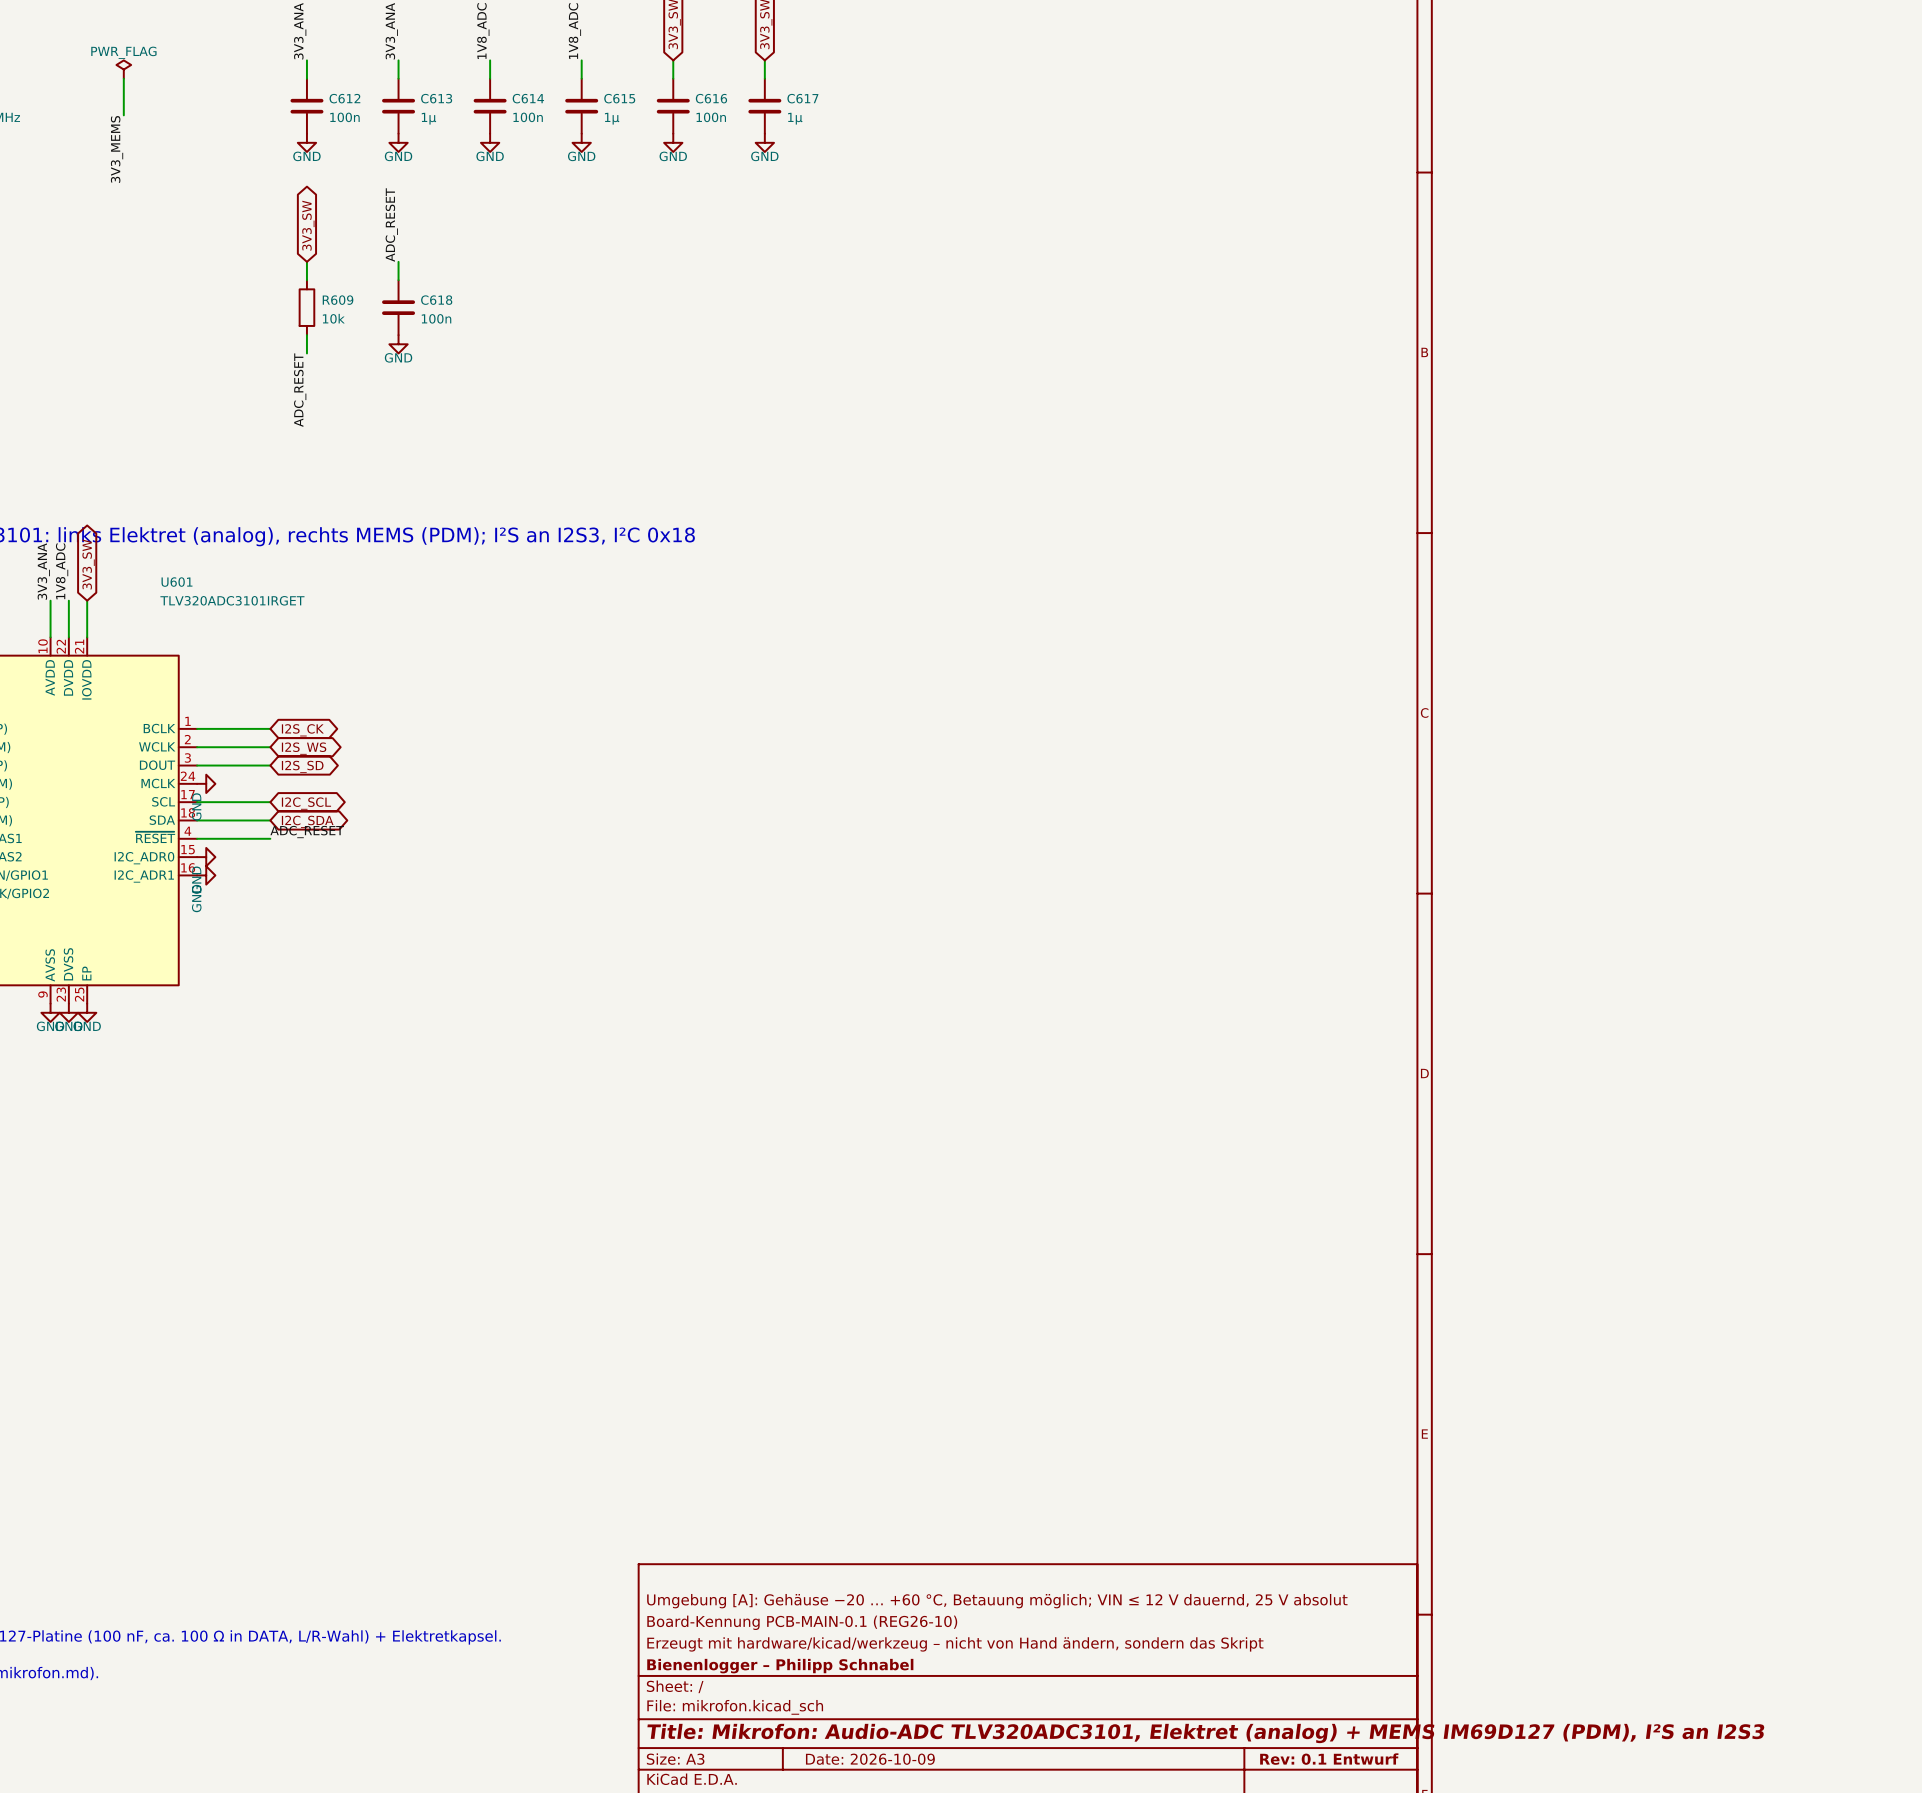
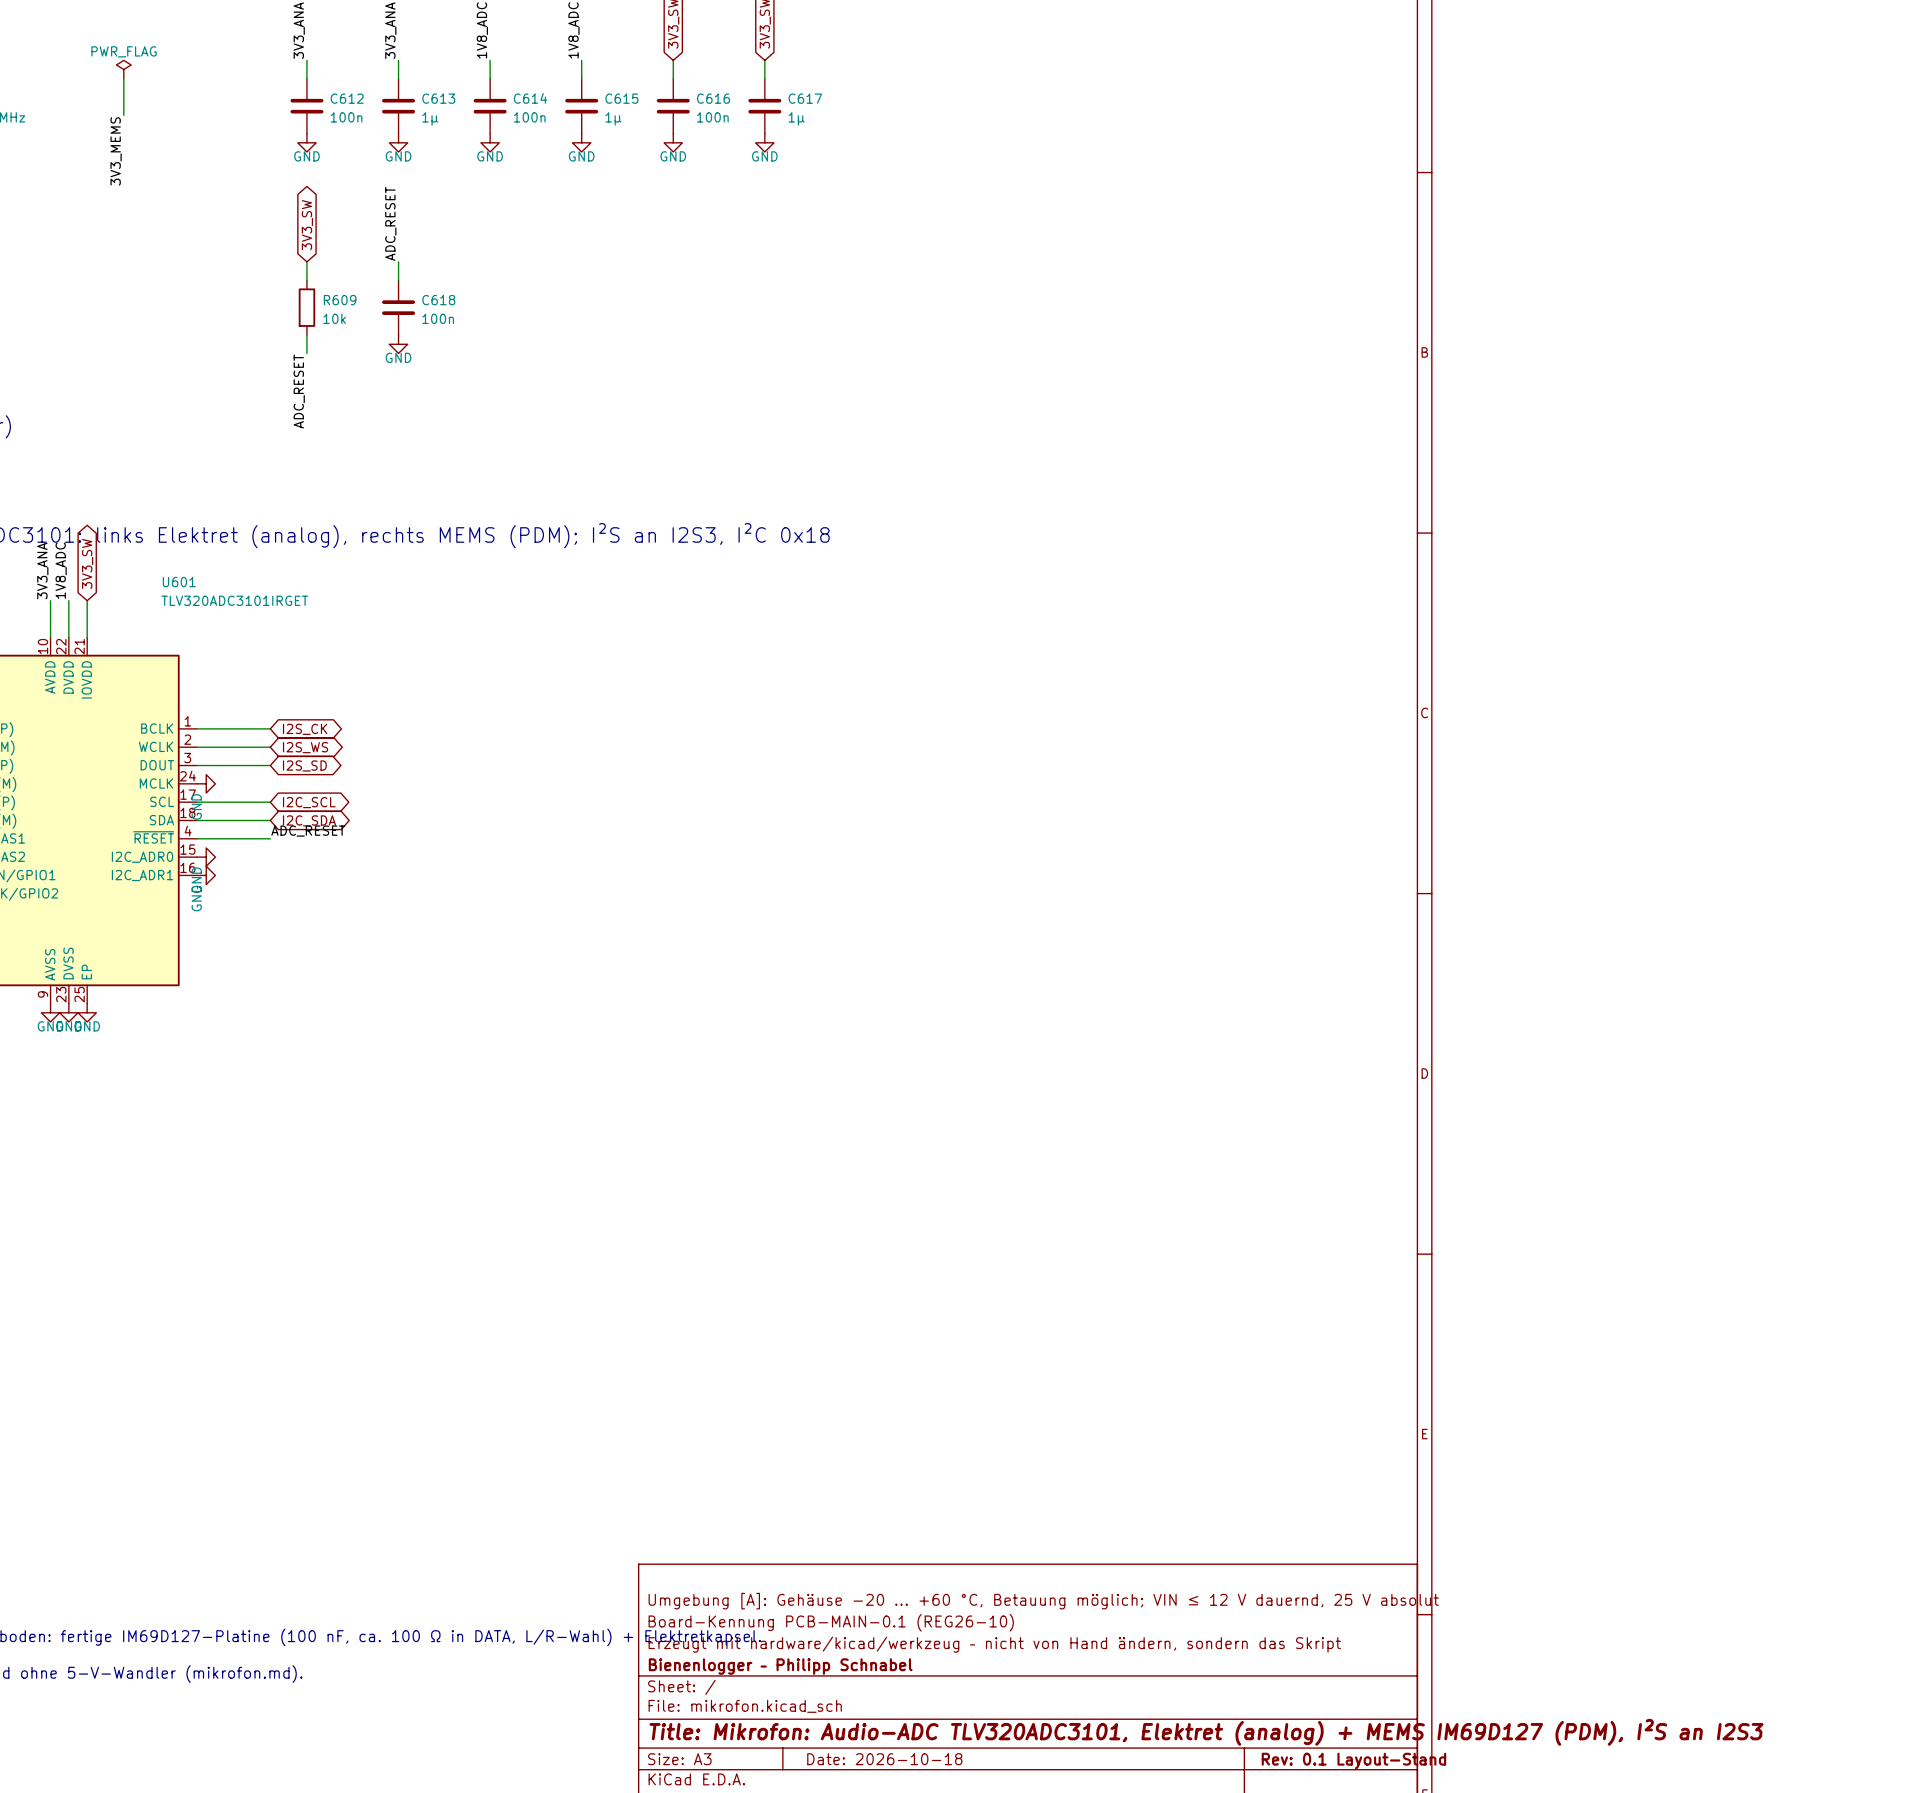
title block: Date: 2026-10-09 (870, 1759) -> Date: 2026-10-18 (884, 1759)
title block: Rev: 0.1 Entwurf (1329, 1759) -> Rev: 0.1 Layout-Stand (1353, 1761)

